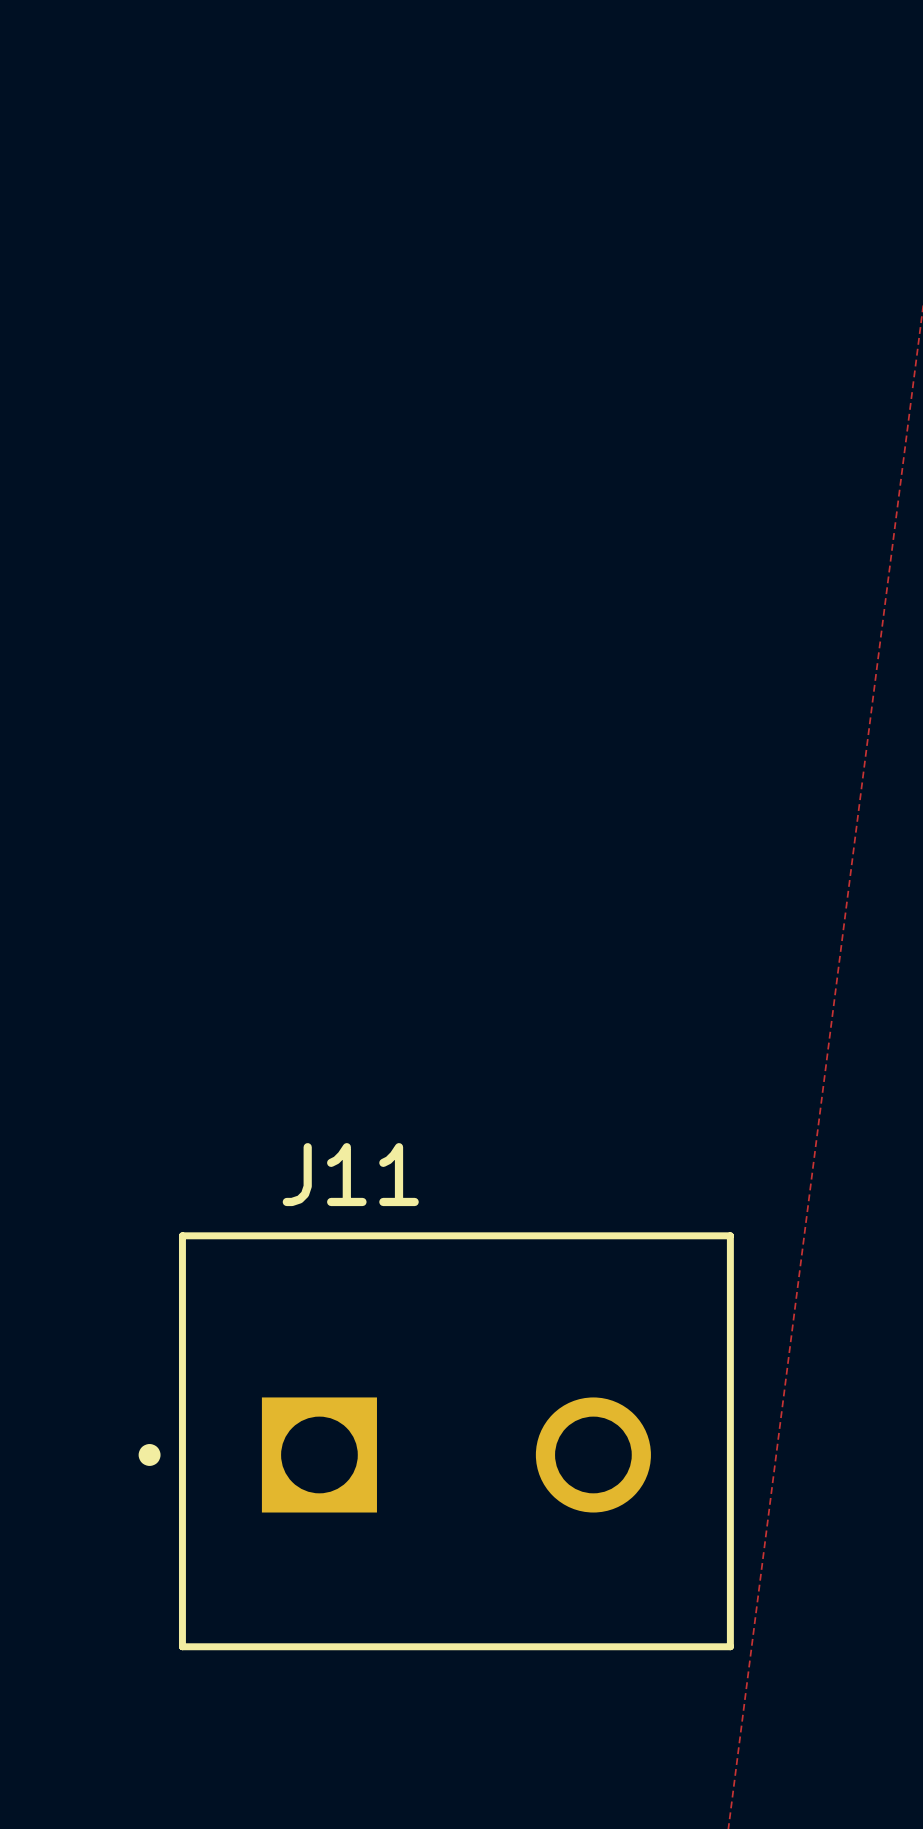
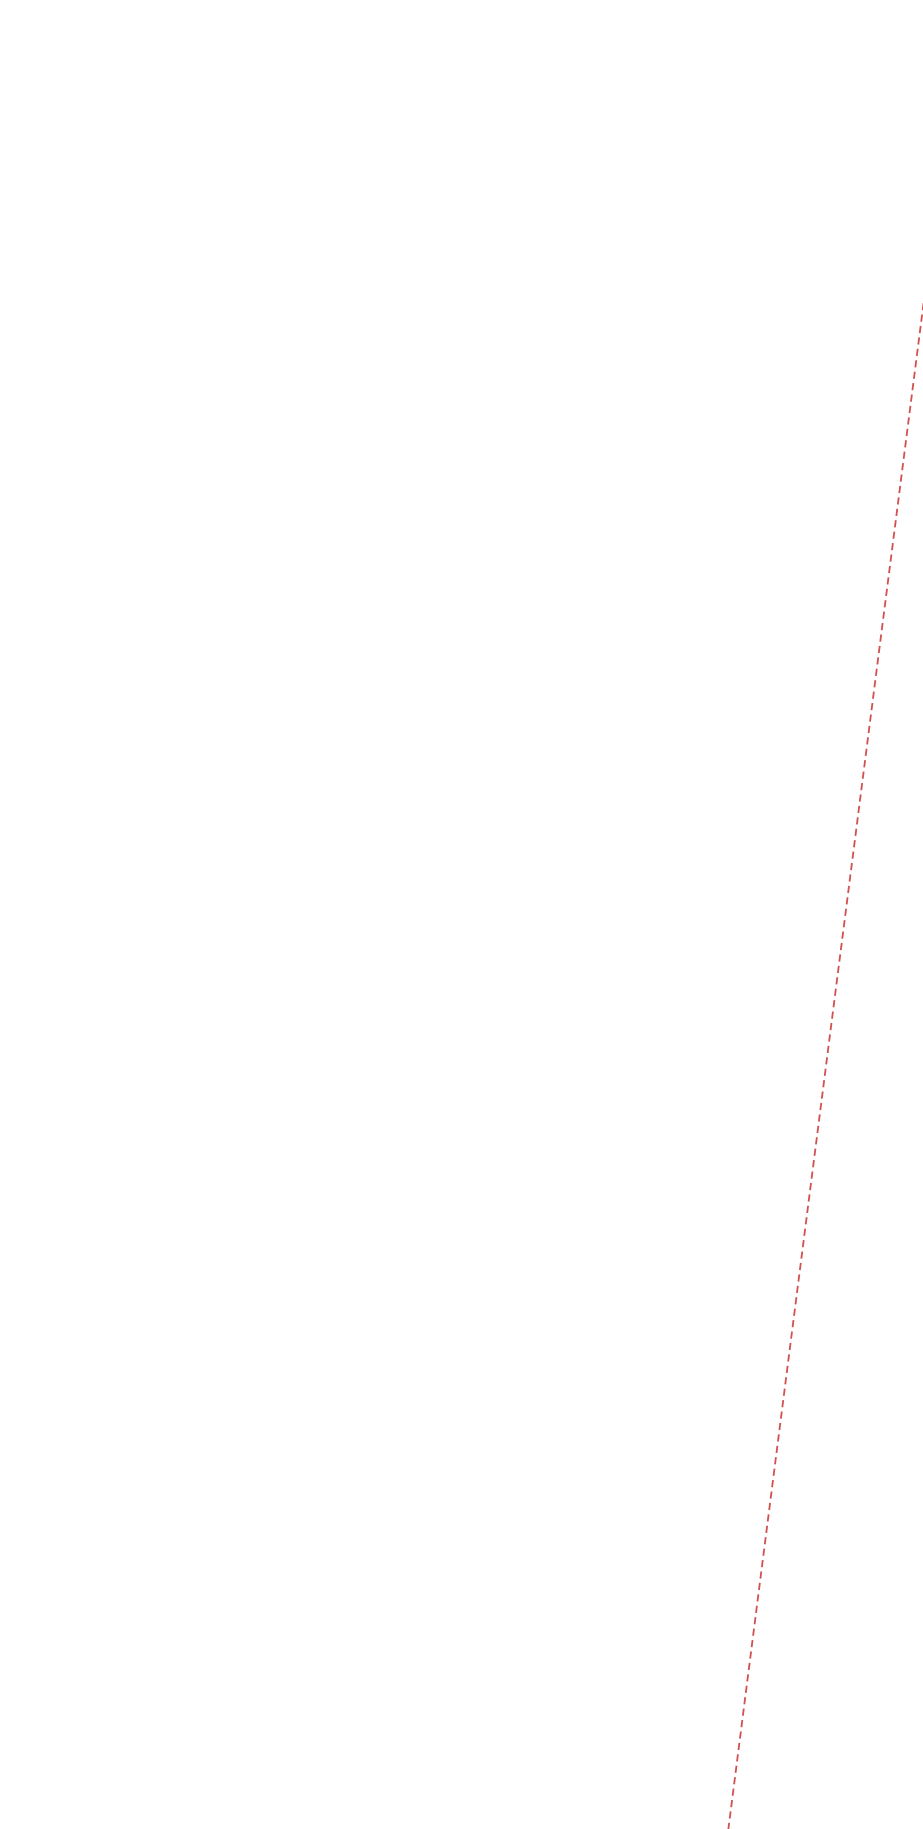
J11: (436, 1441) -> none

